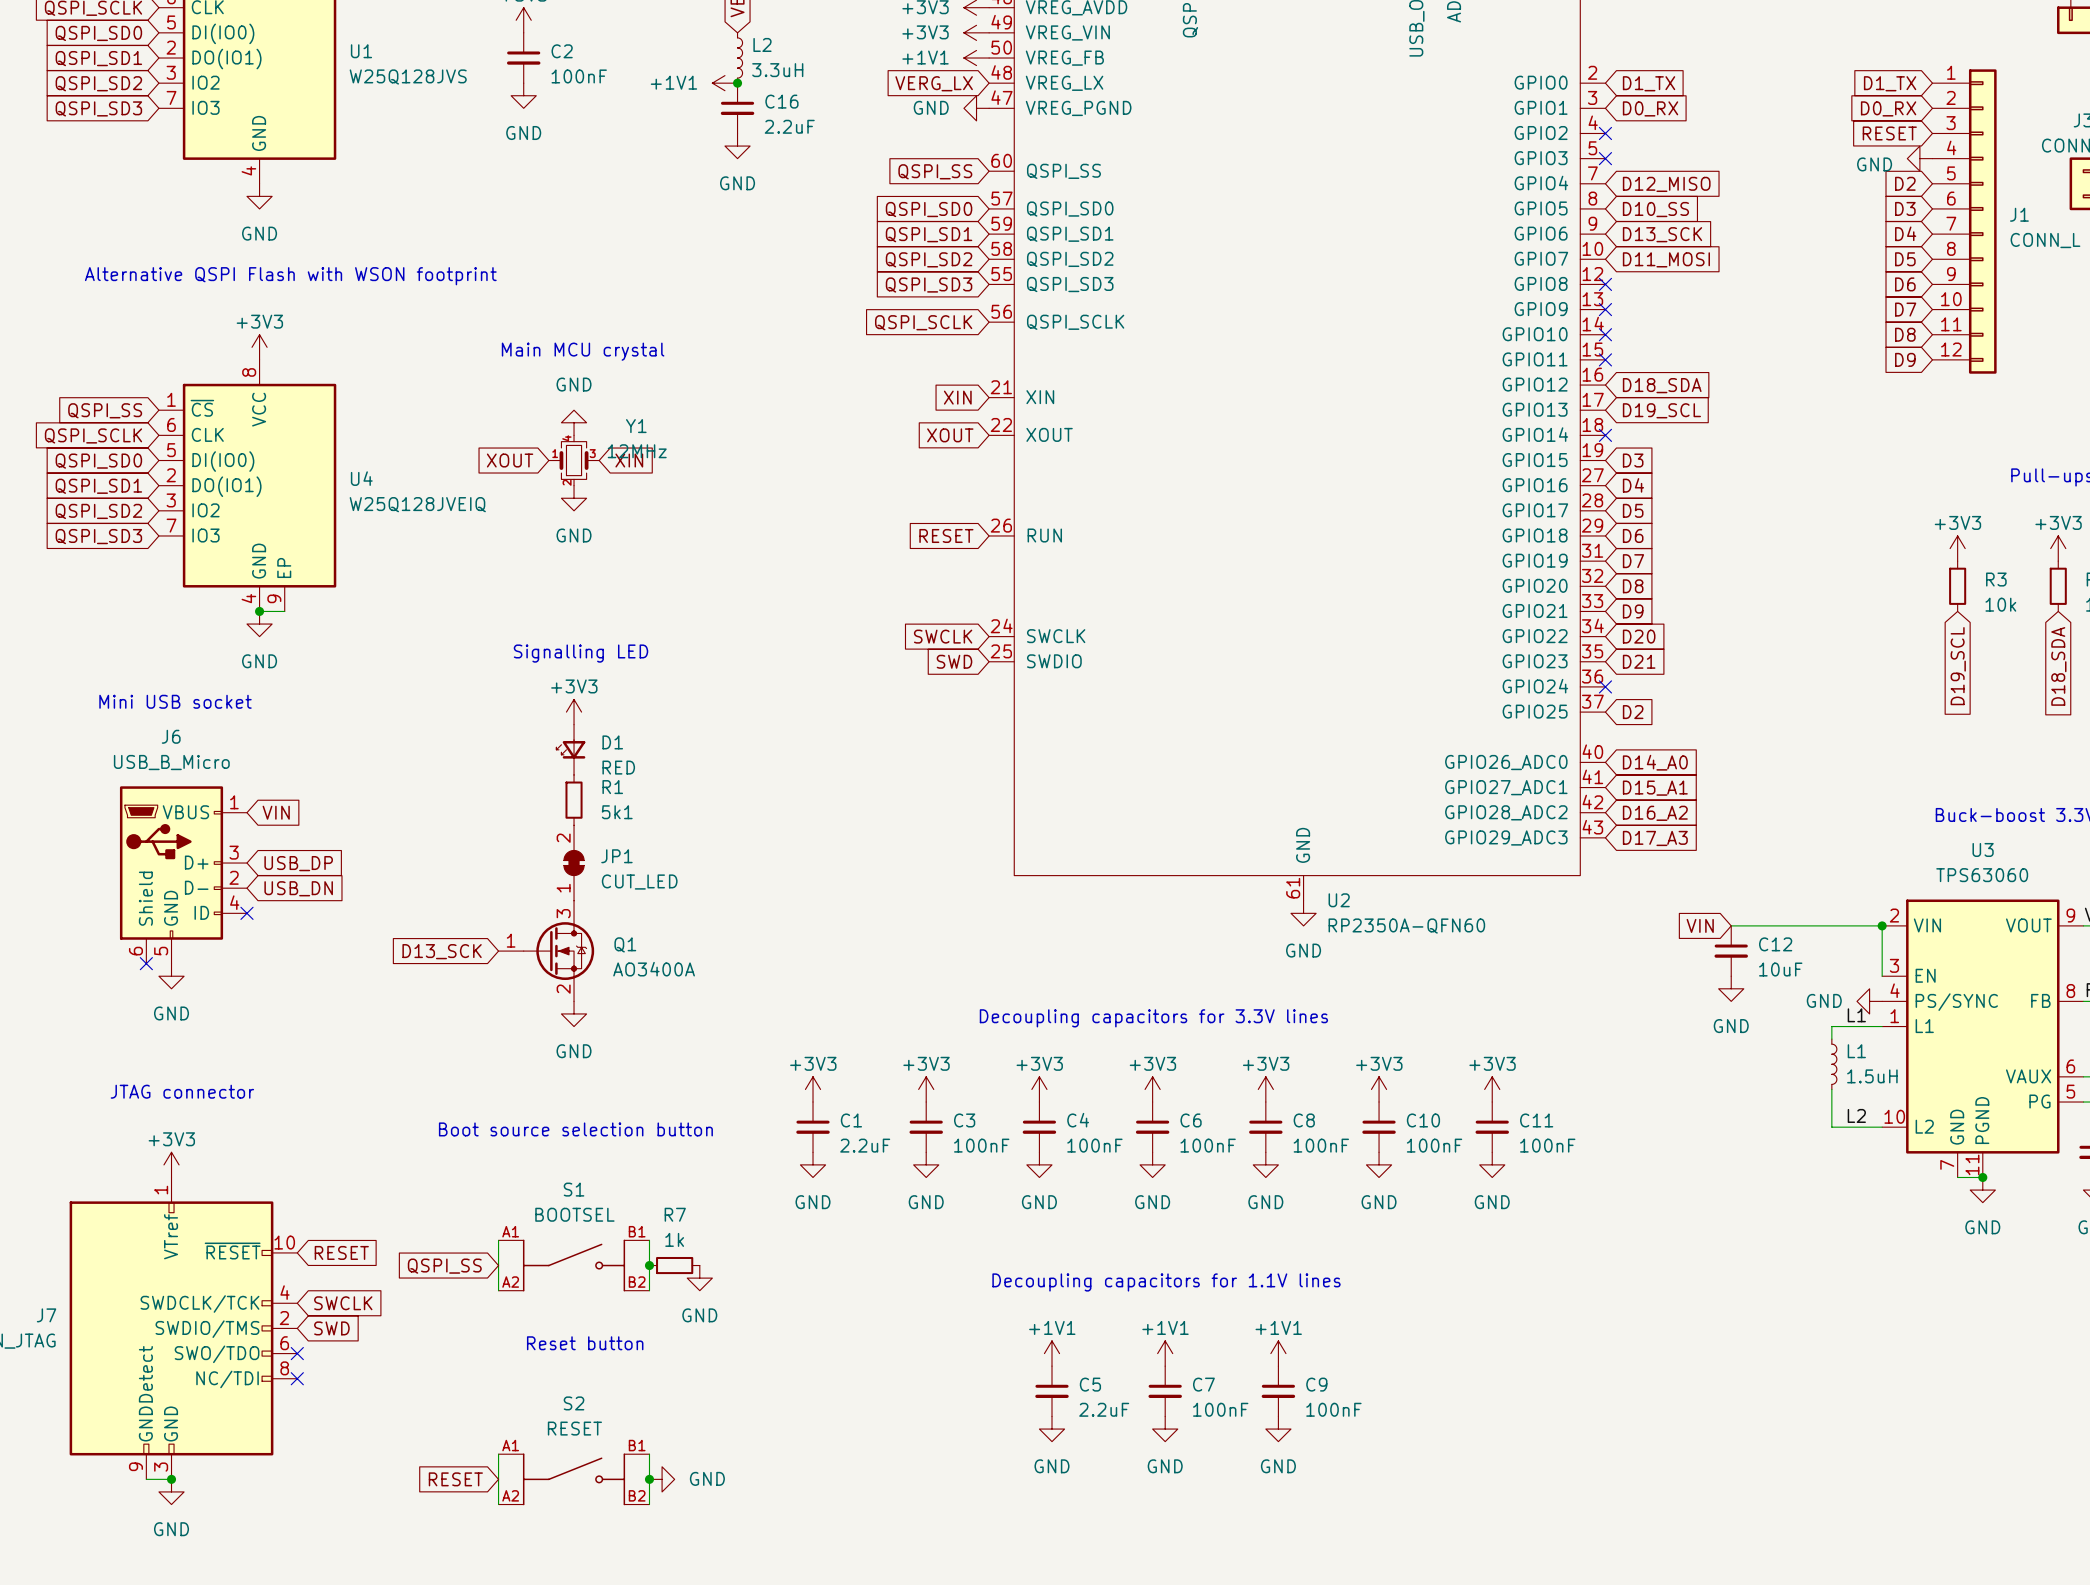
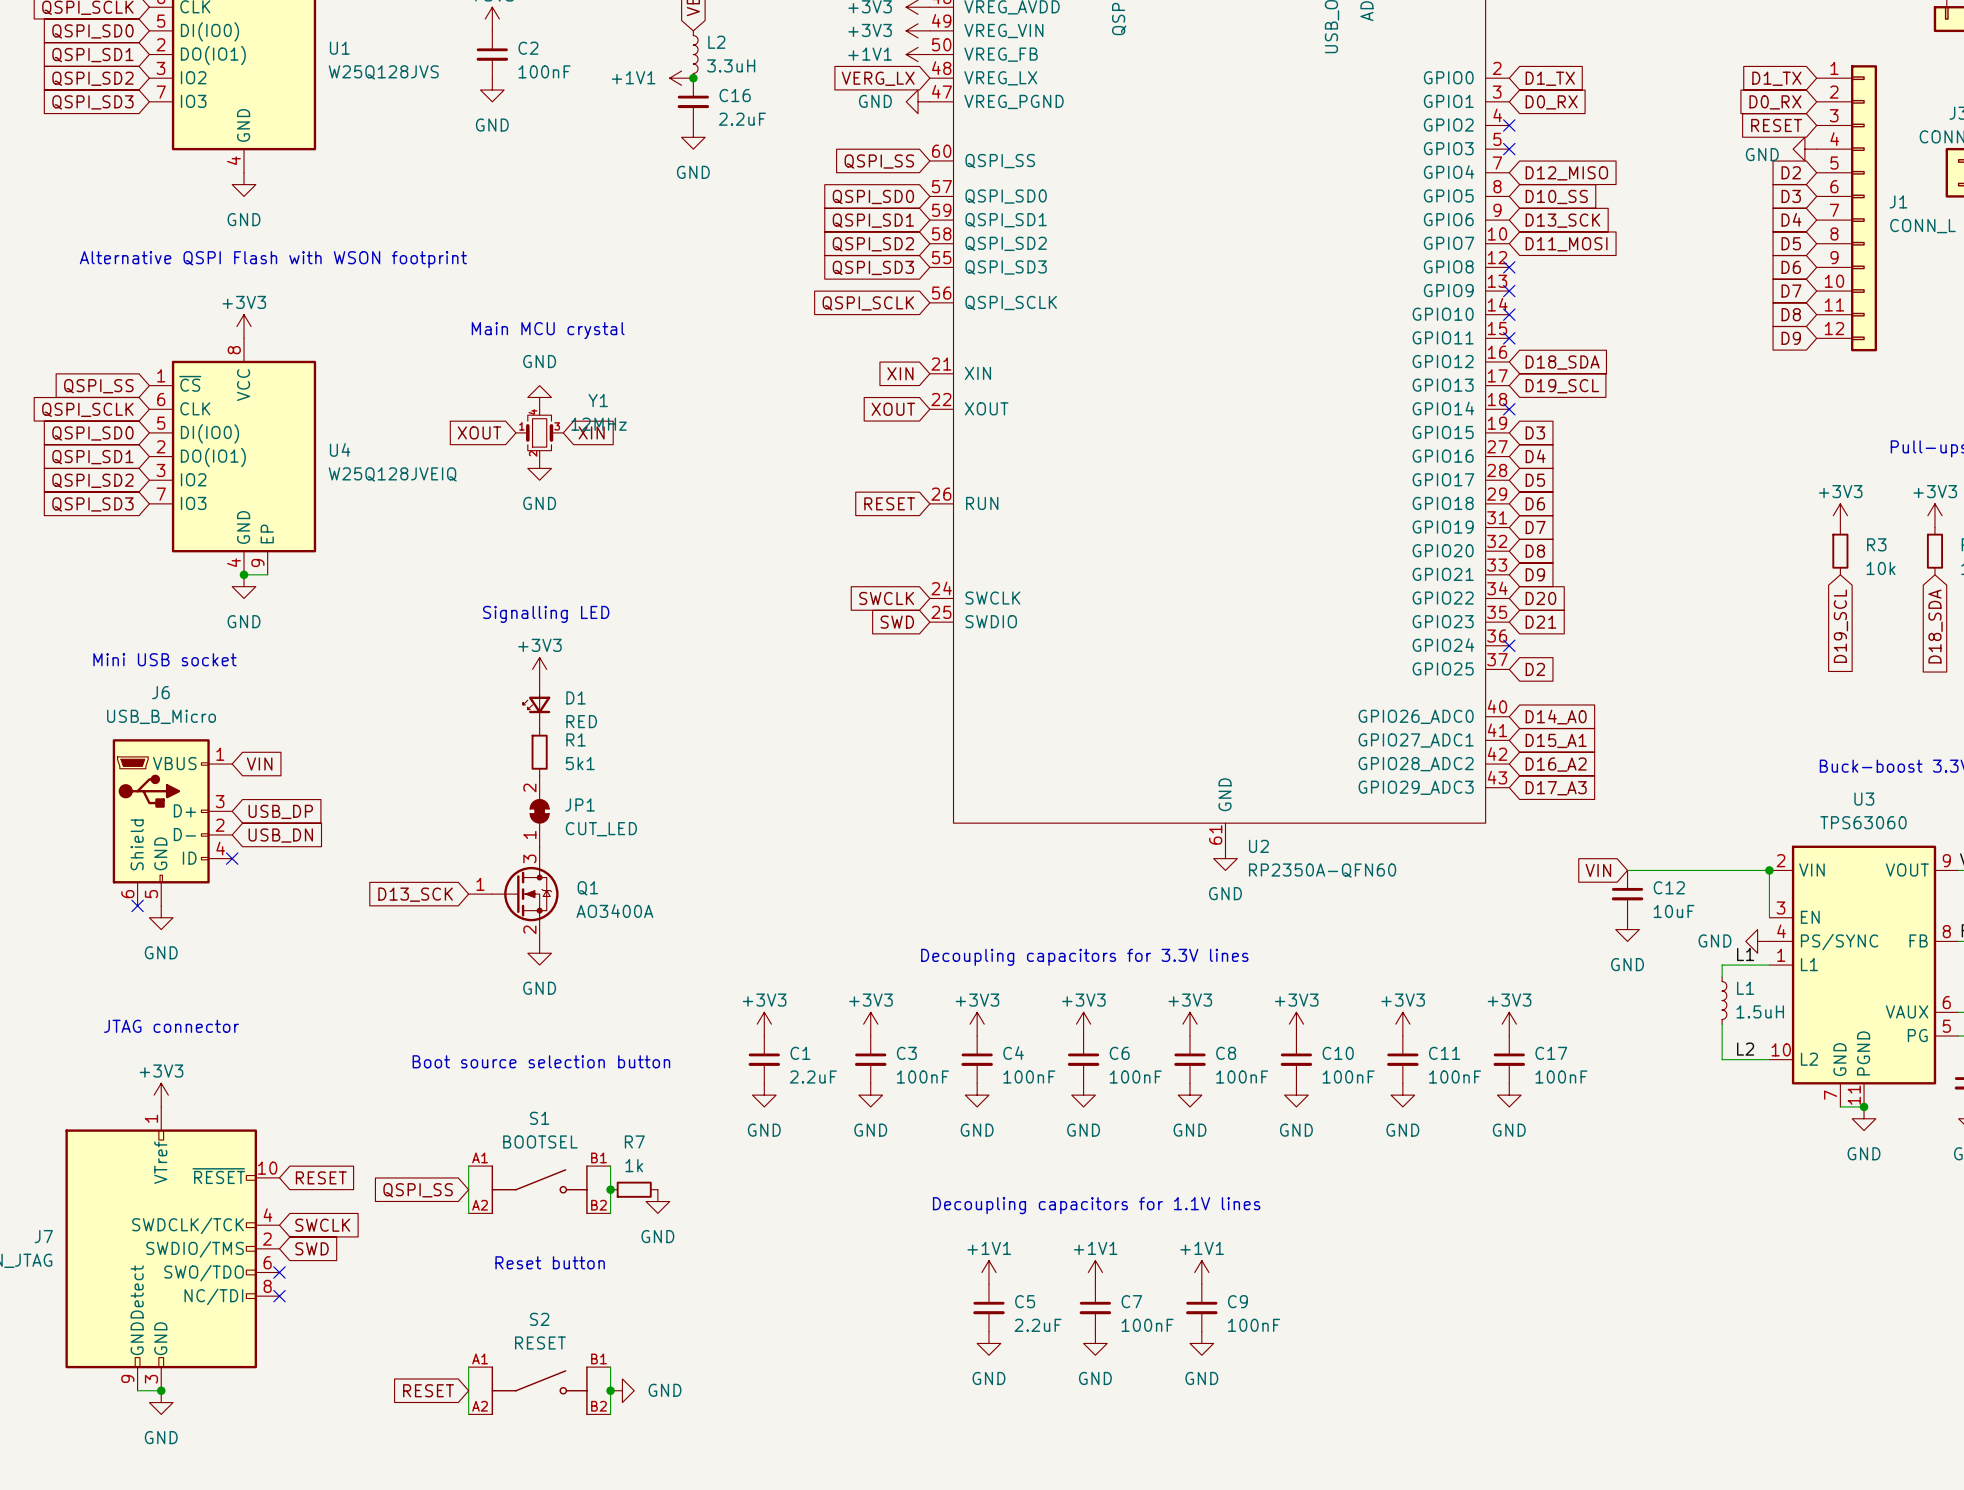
power symbol: none -> +3V3 (1509, 1024)
C17: none -> 100nF (1509, 1059)
power symbol: none -> GND (1509, 1095)

